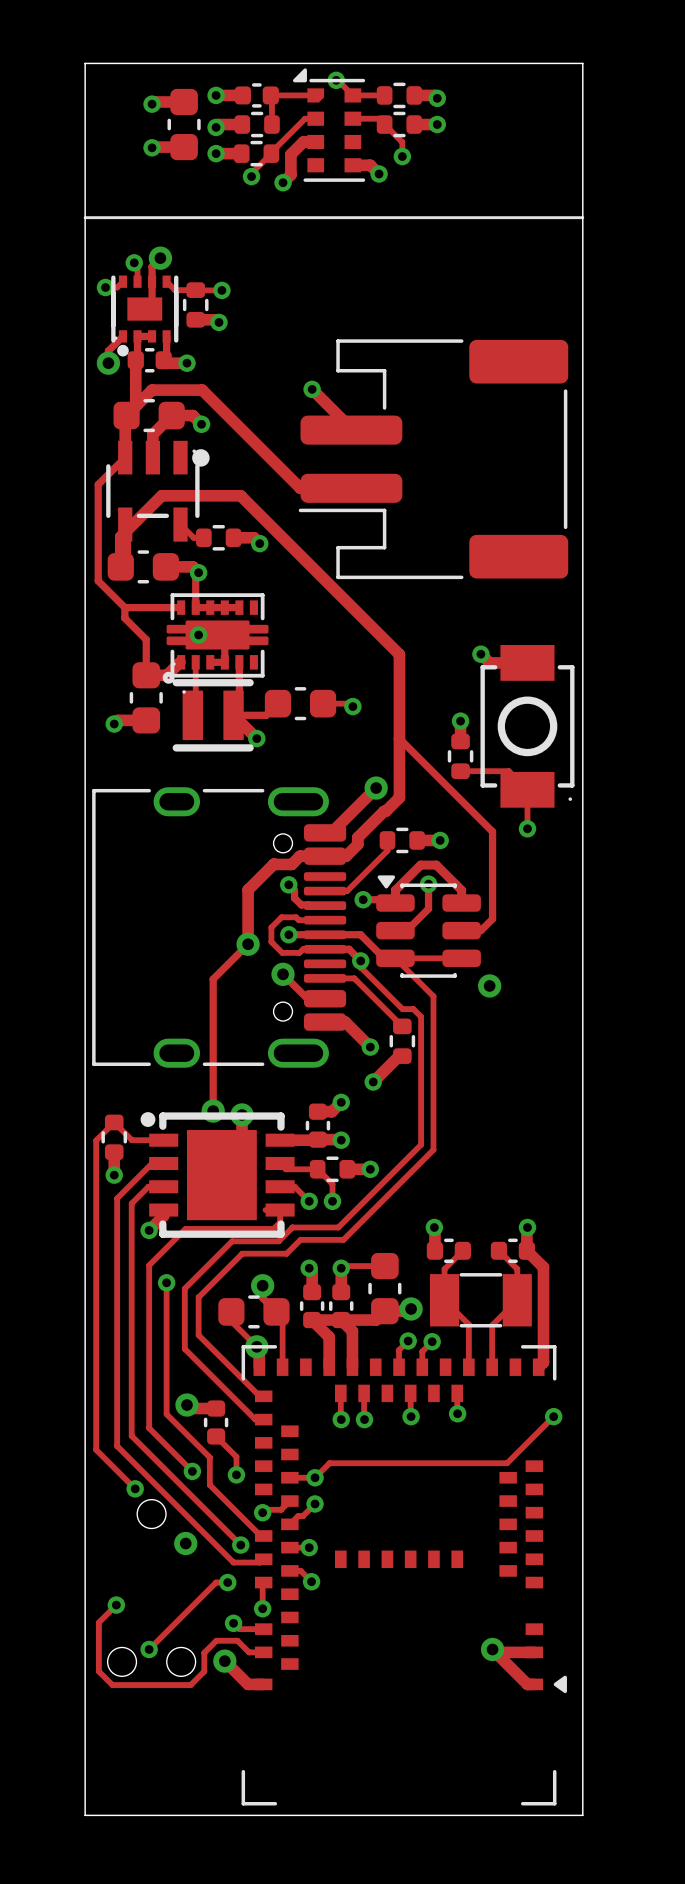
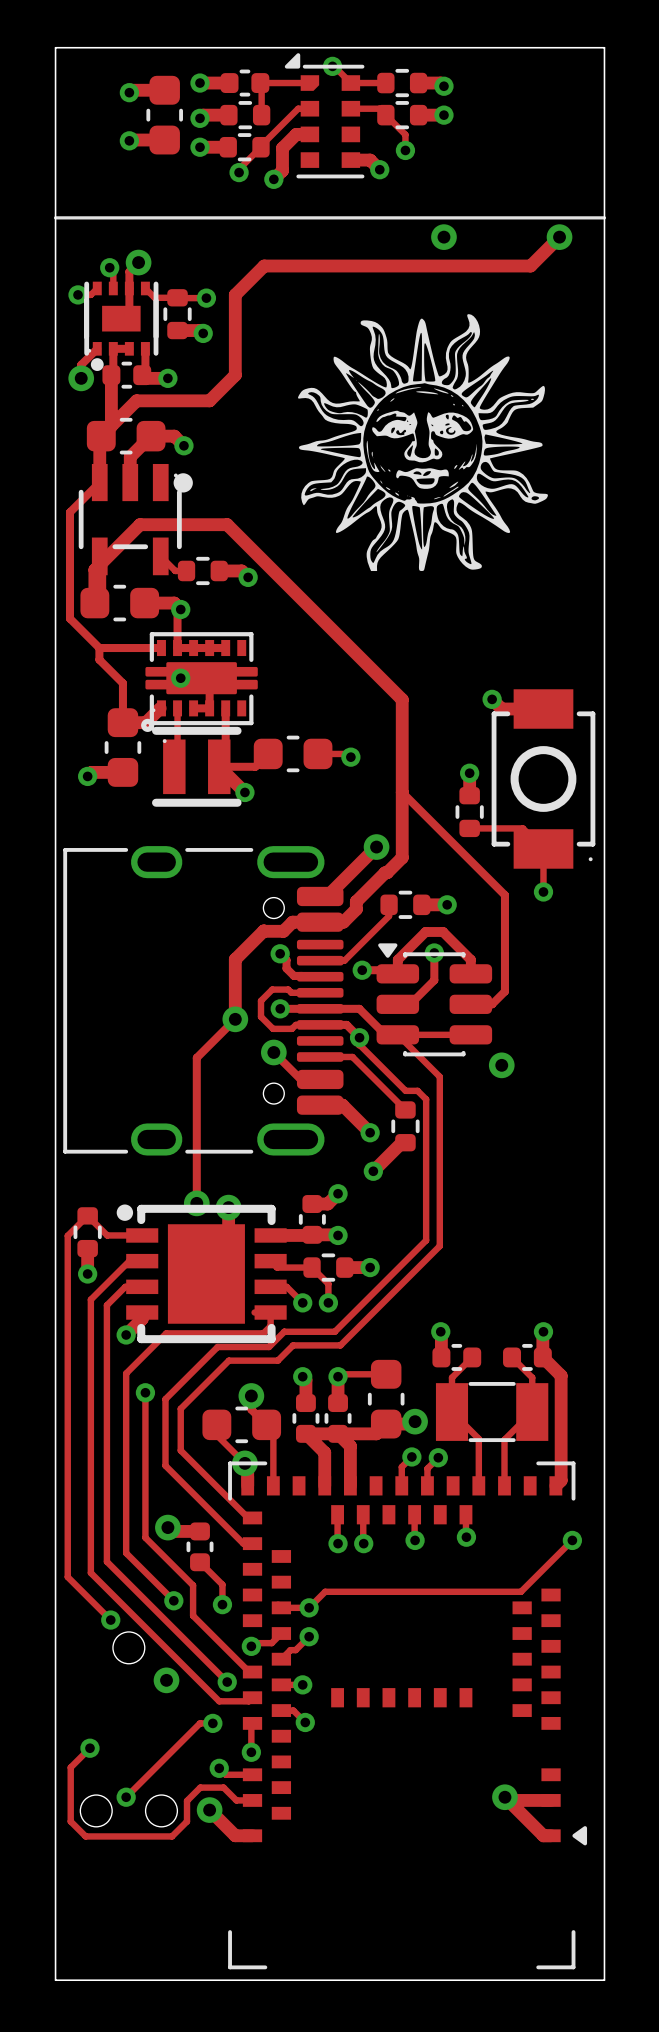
via: none -> (443, 237)
via: none -> (559, 237)
drawing: none -> [298, 314, 548, 572]
track: (312, 389) (351, 430) -> none
via: (312, 389) -> none
track: (152, 390) (202, 390) (300, 488) (351, 488) -> (129, 408) (136, 400) (209, 400) (235, 375) (235, 294) (264, 266) (530, 266) (559, 237)
part: (433, 459) -> none

